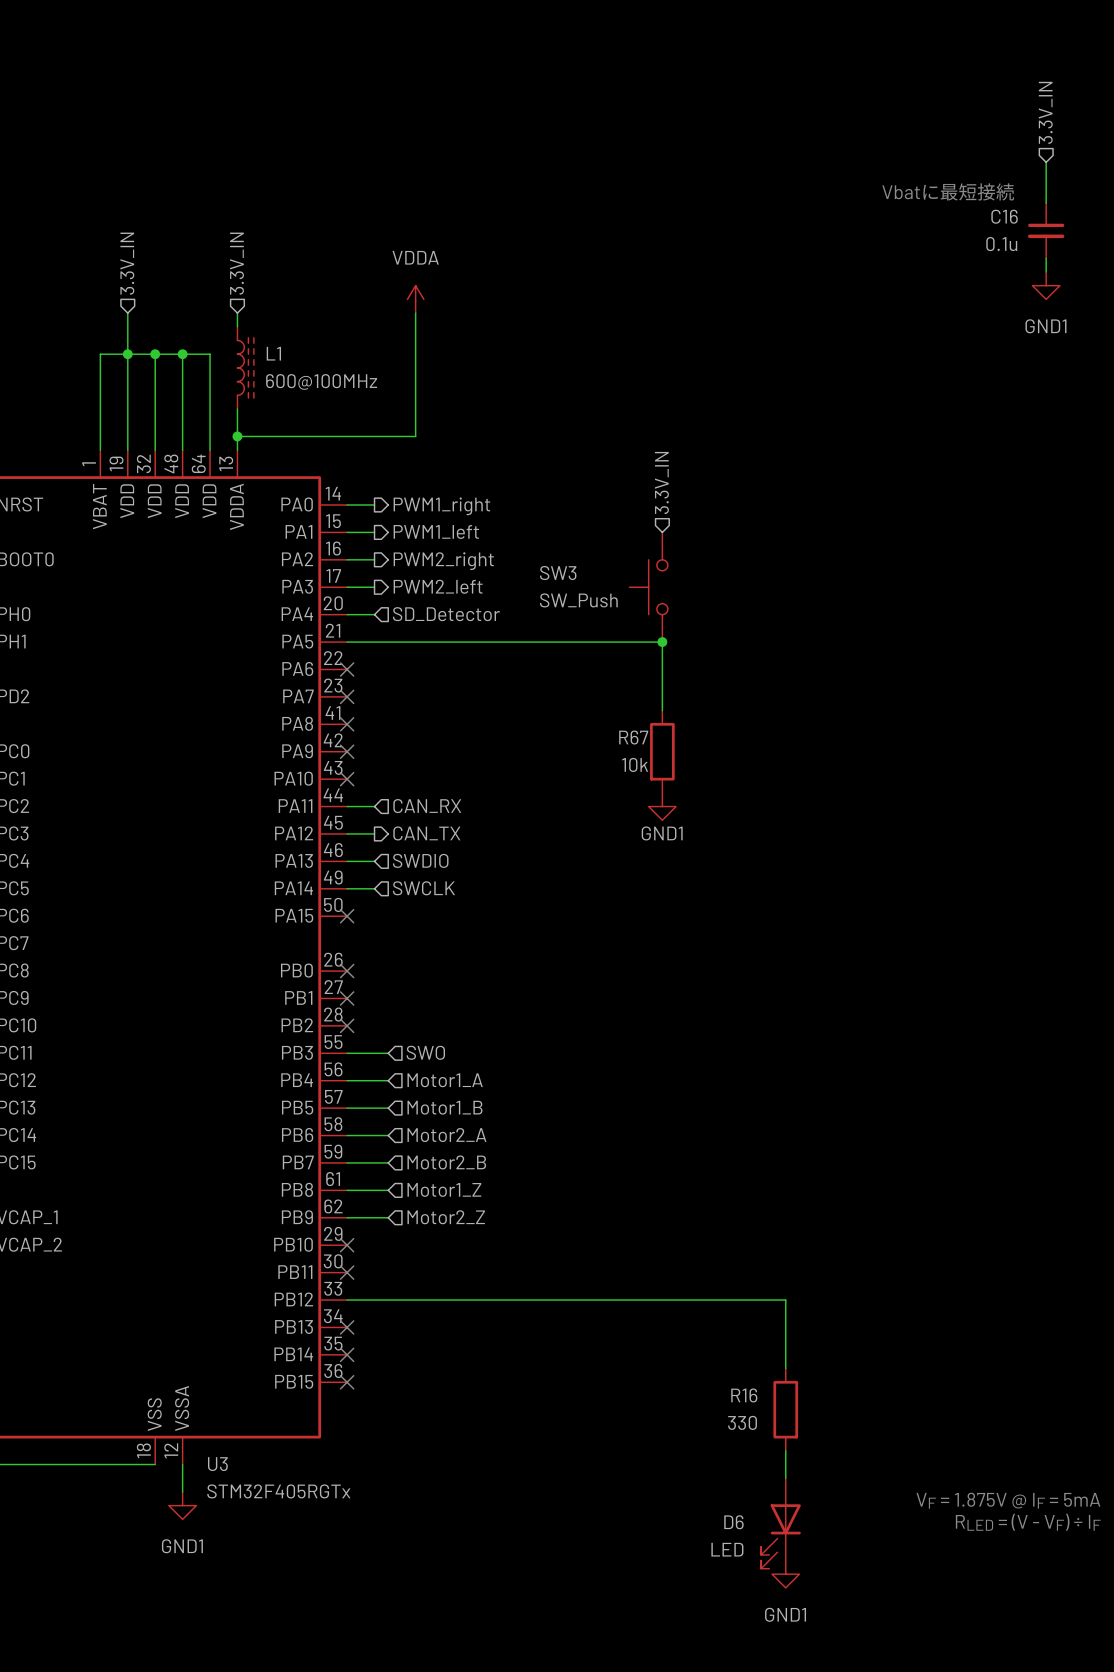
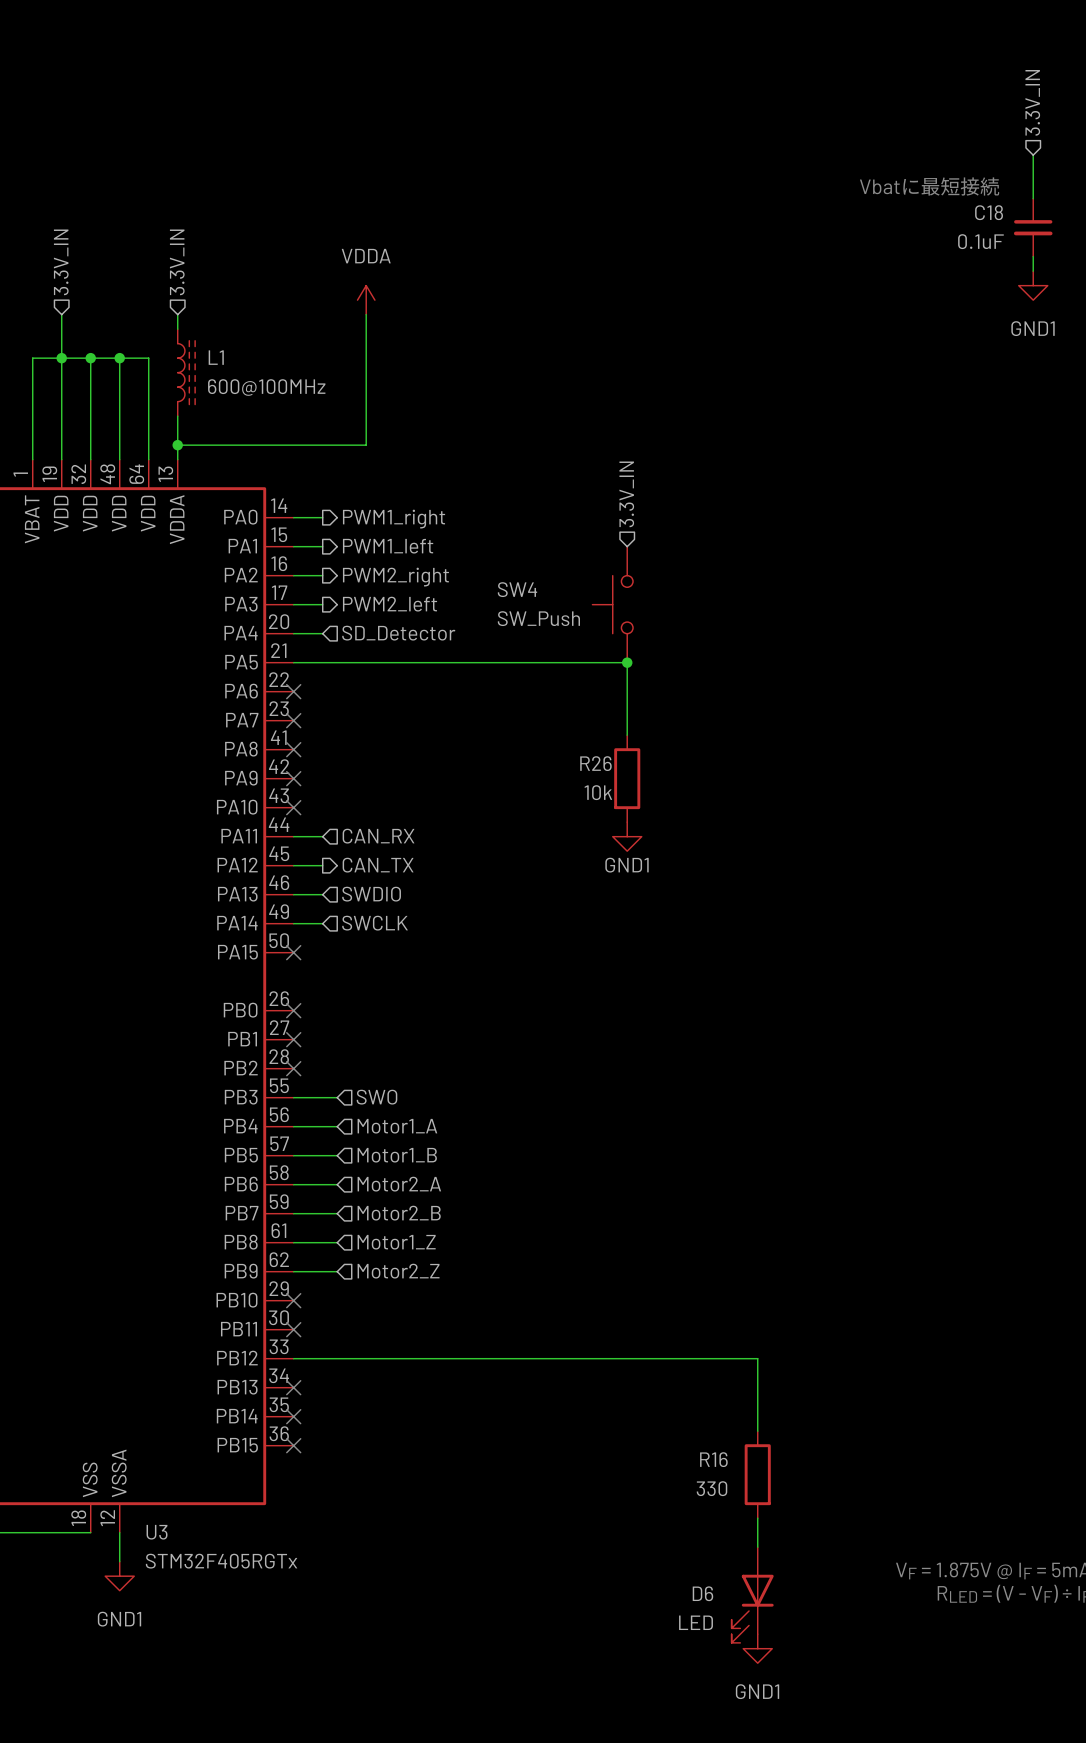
C16 name: C16 (1004, 216) -> C18 (989, 212)
C16 value: 0.1u (1001, 244) -> 0.1uF (980, 241)
SW3 name: SW3 (558, 573) -> SW4 (517, 589)
R67 name: R67 (633, 737) -> R26 (595, 763)

